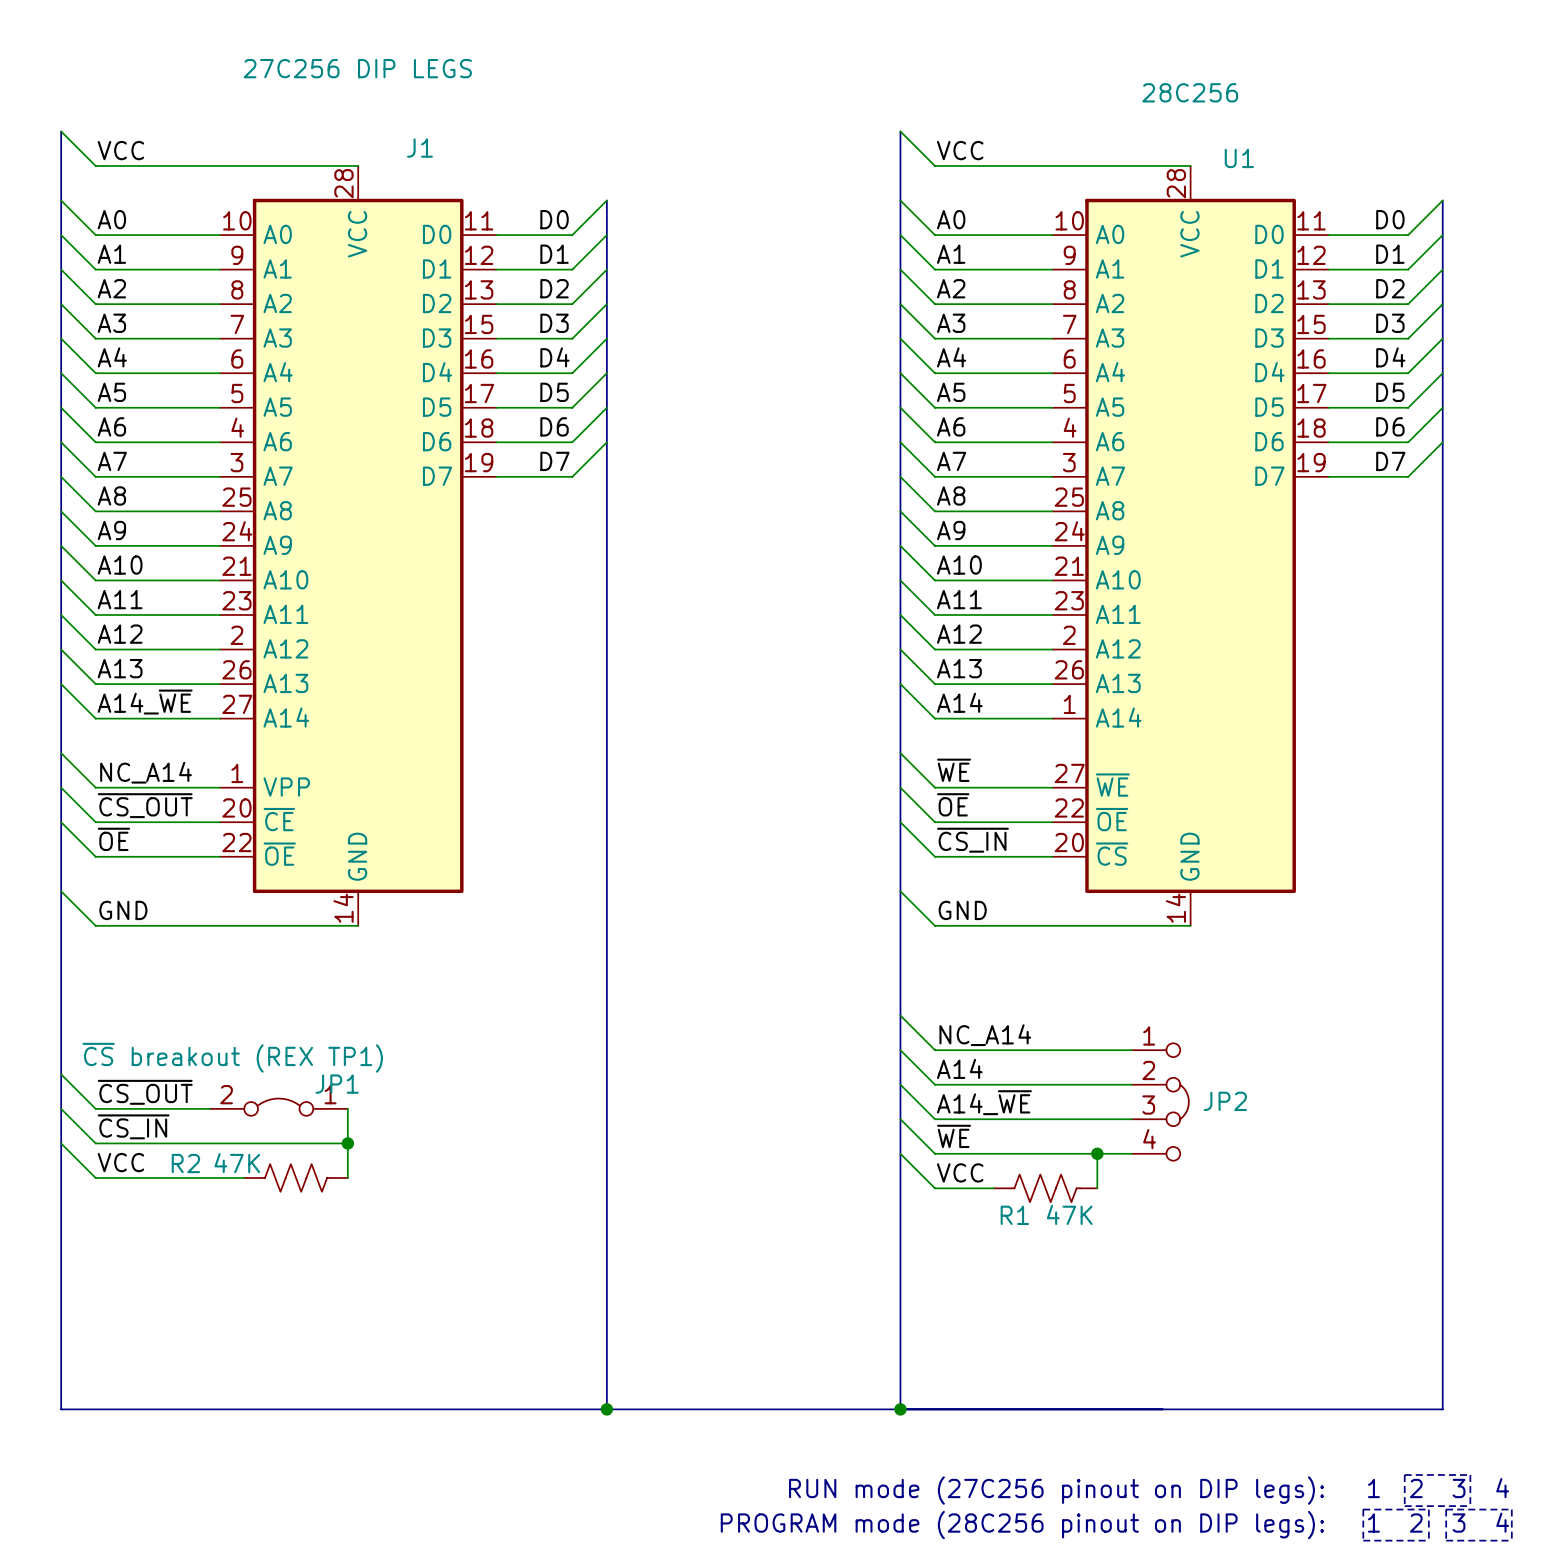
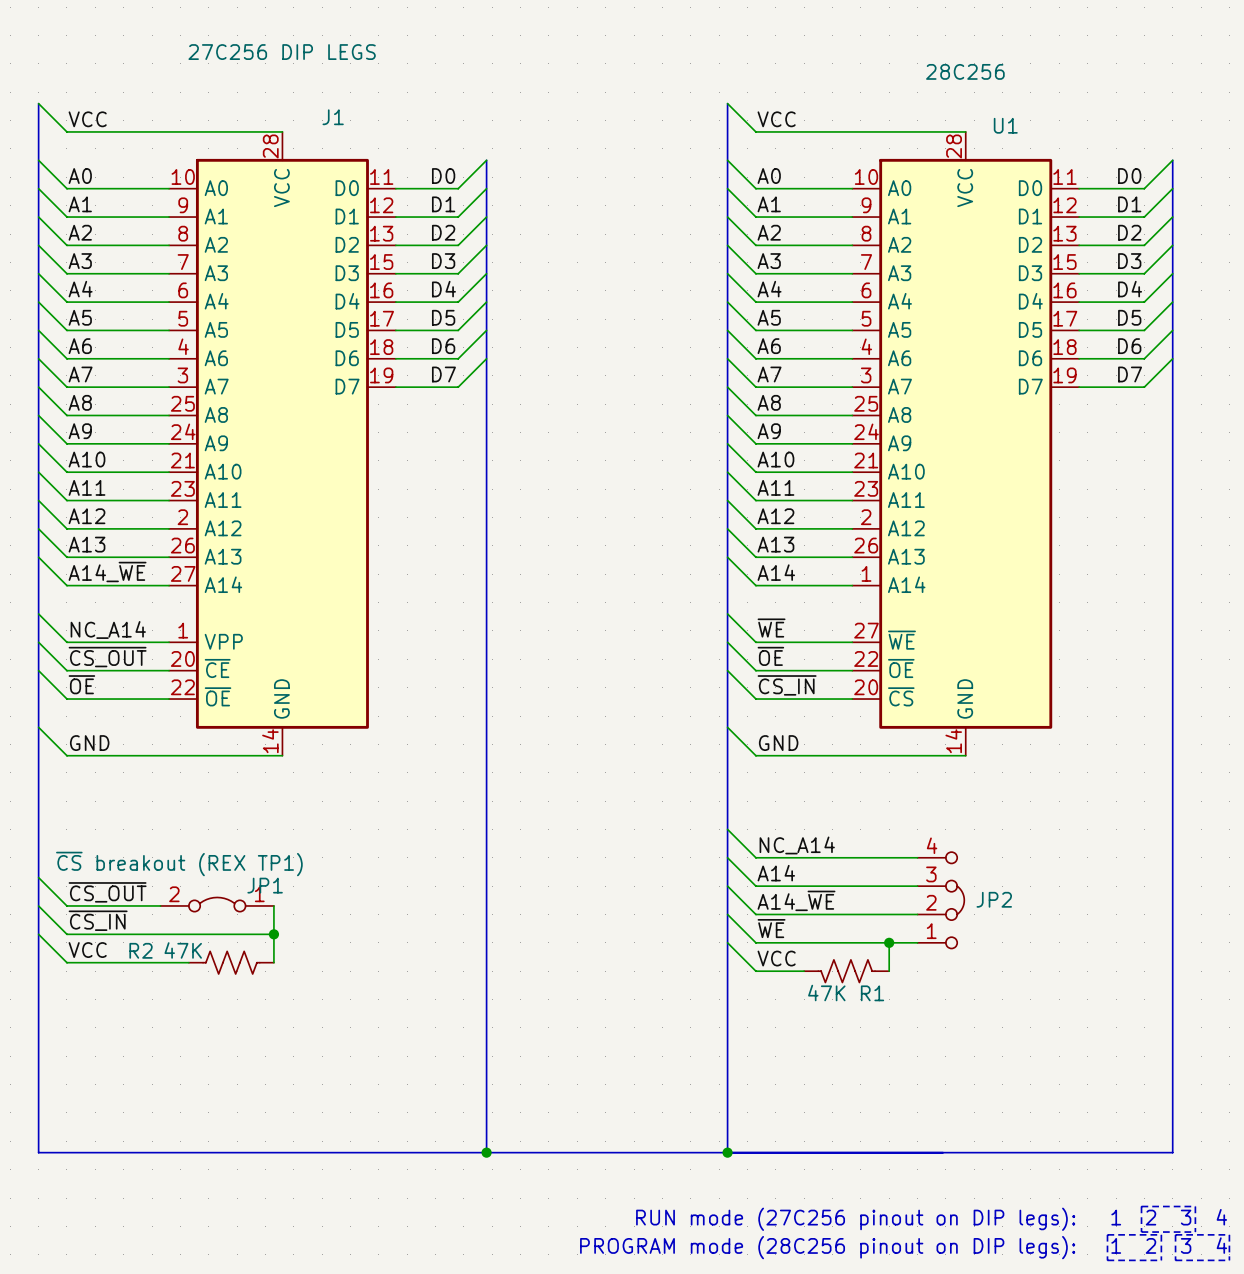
JP2 flip: as is (1177, 1101) -> up-down (955, 900)
R1 flip: as is (1045, 1188) -> left-right (846, 971)

